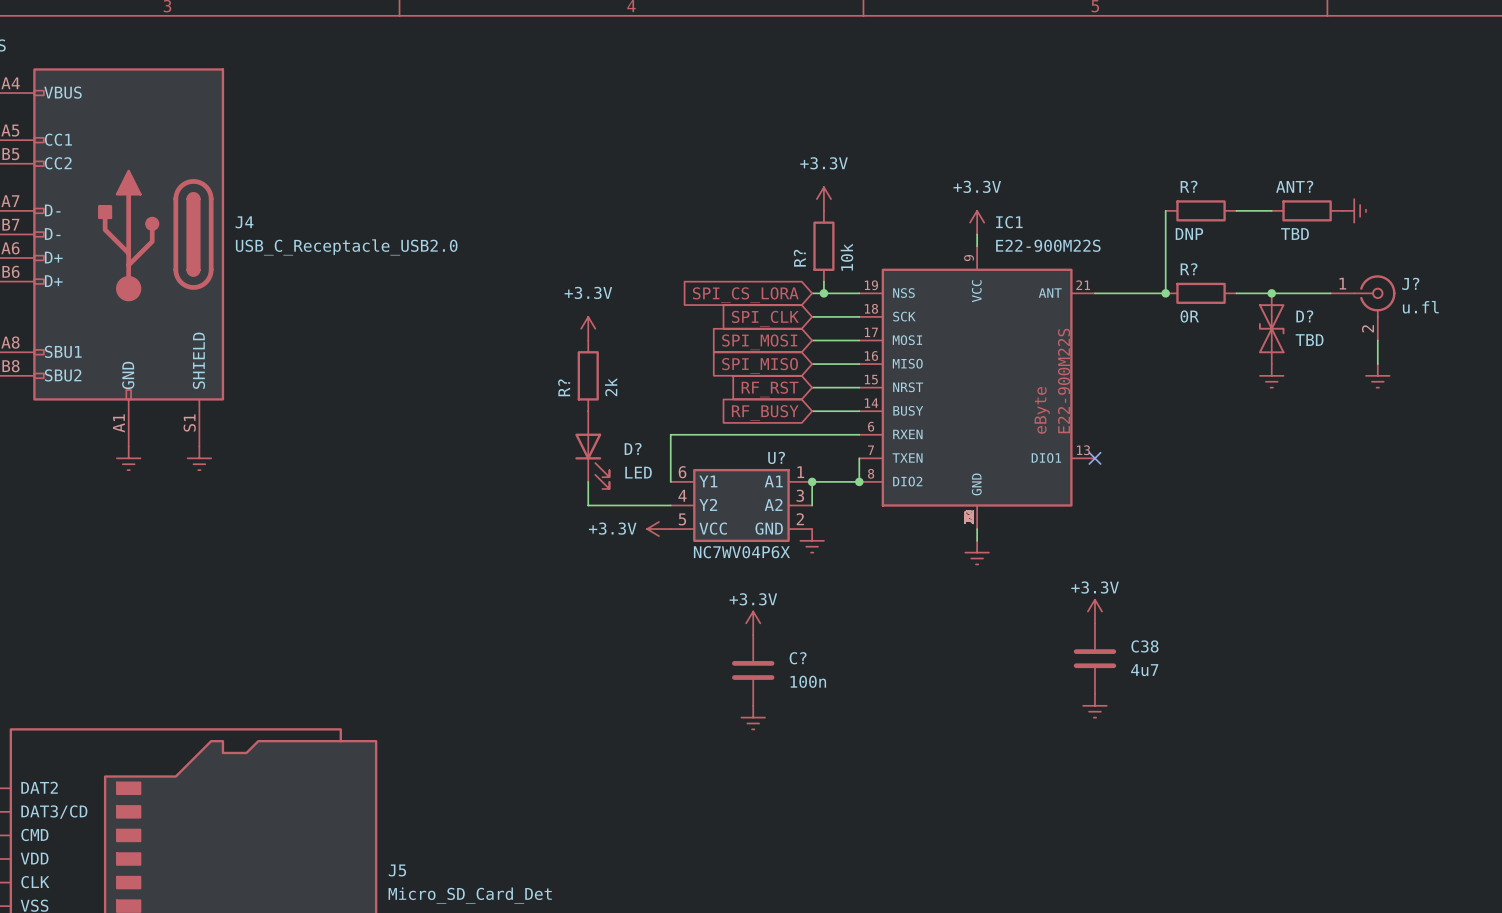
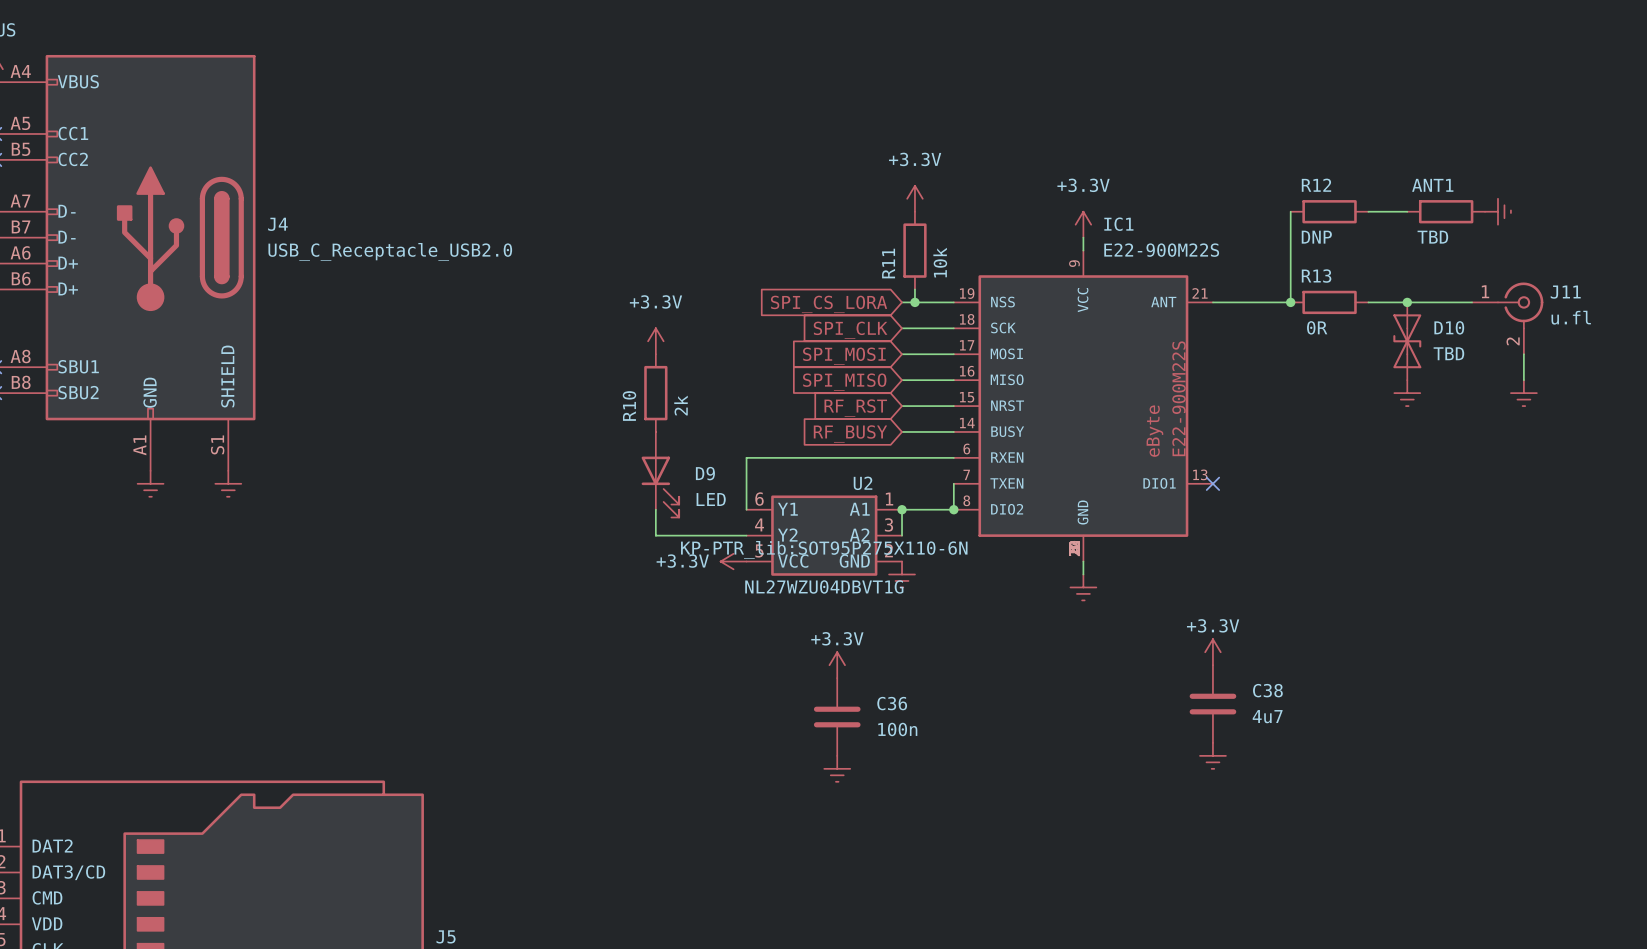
R? name: R? (1189, 186) -> R12 (1316, 185)
ANT? name: ANT? (1294, 186) -> ANT1 (1432, 185)
R? name: R? (799, 258) -> R11 (888, 263)
R? name: R? (1189, 269) -> R13 (1316, 276)
J? name: J? (1410, 283) -> J11 (1565, 292)
D? name: D? (1304, 316) -> D10 (1449, 327)
R? name: R? (564, 387) -> R10 (629, 406)
D? name: D? (633, 448) -> D9 (705, 473)
U? name: U? (776, 457) -> U2 (863, 483)
U? text: none -> KP-PTR_lib:SOT95P275X110-6N (824, 549)
U? value: NC7WV04P6X (741, 552) -> NL27WZU04DBVT1G (824, 586)
C? name: C? (798, 658) -> C36 (892, 703)

